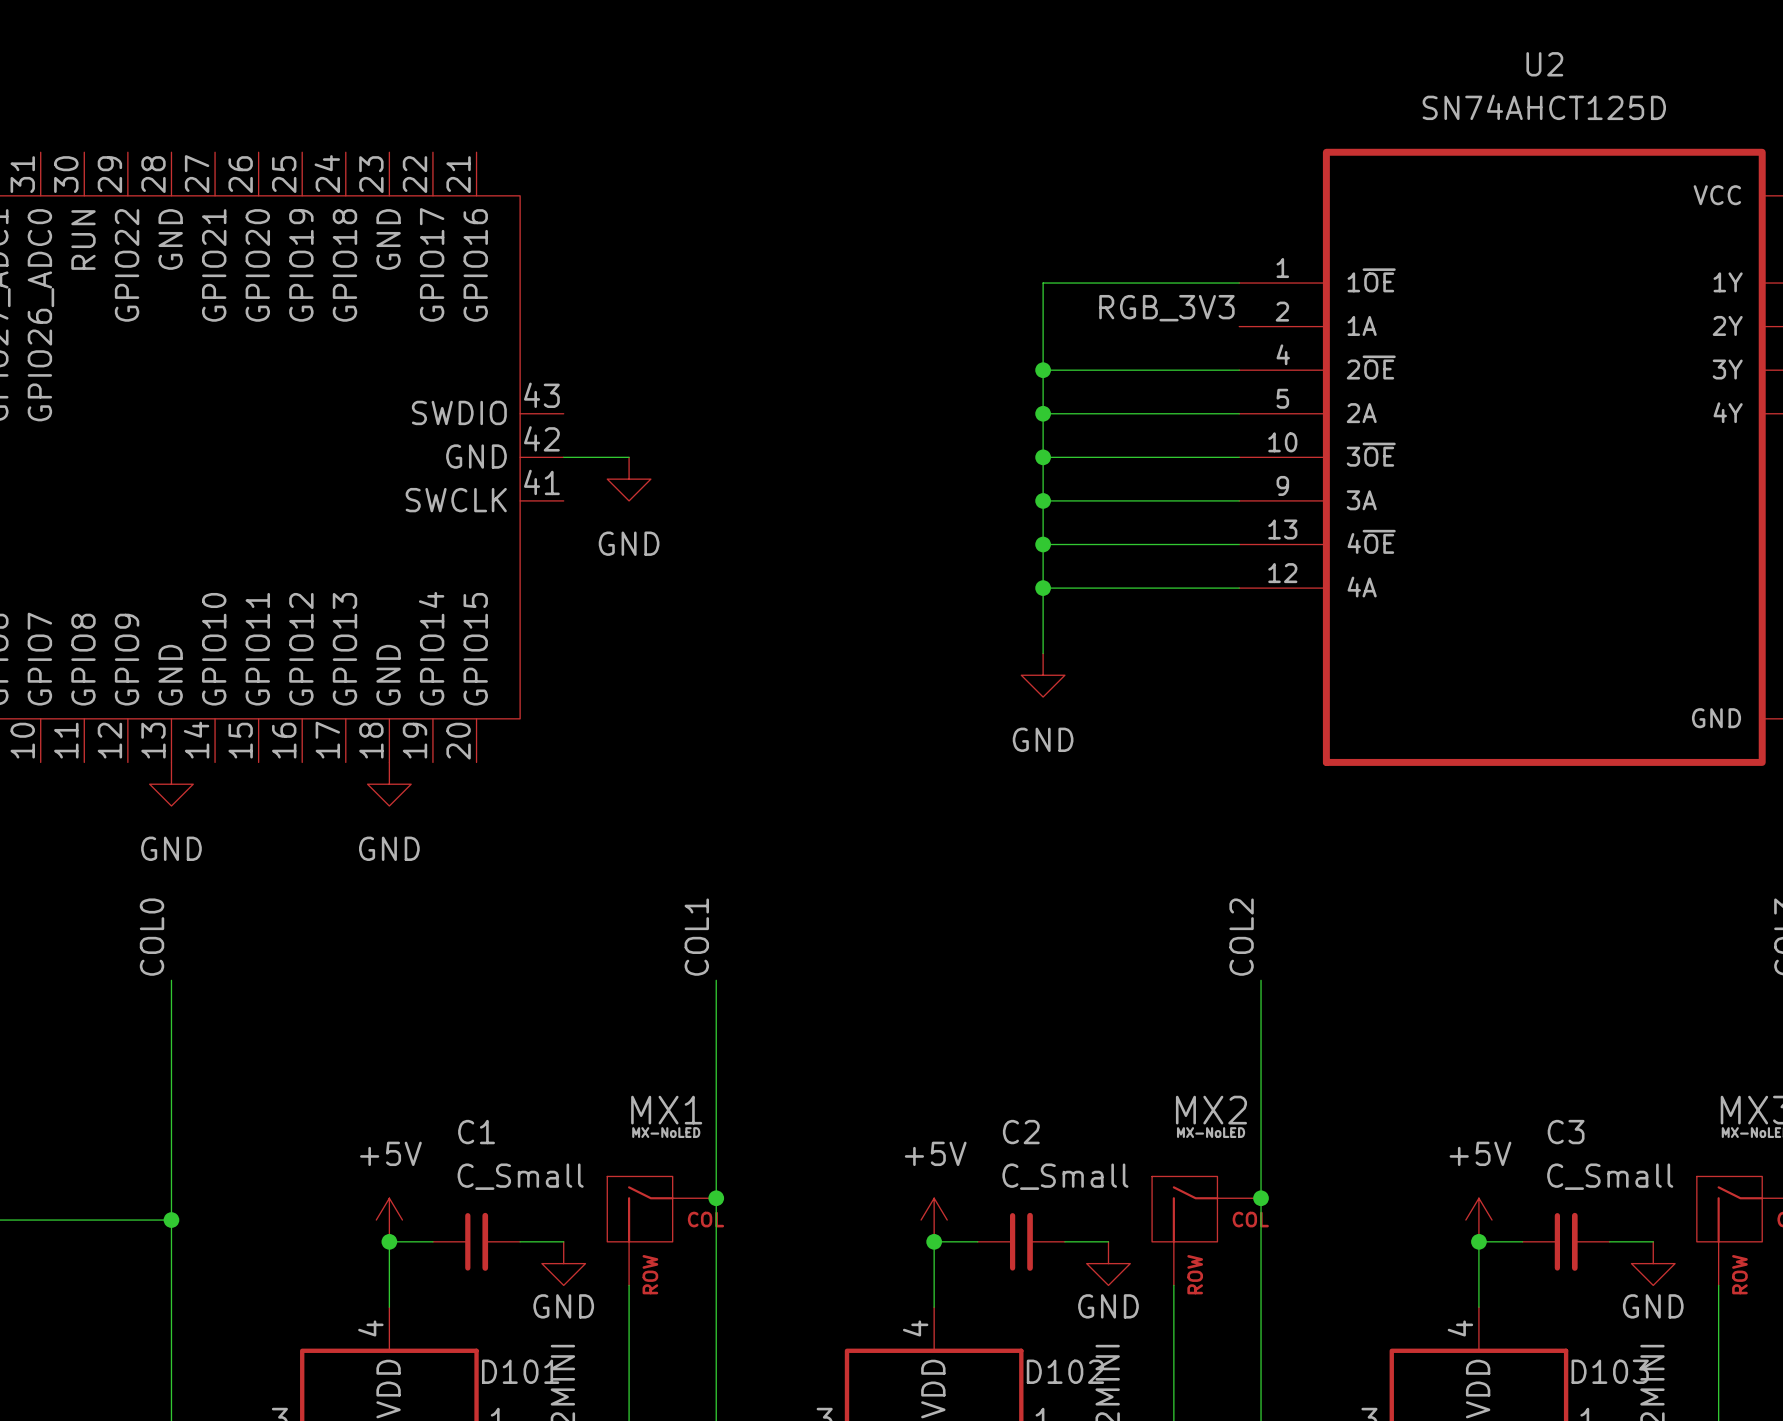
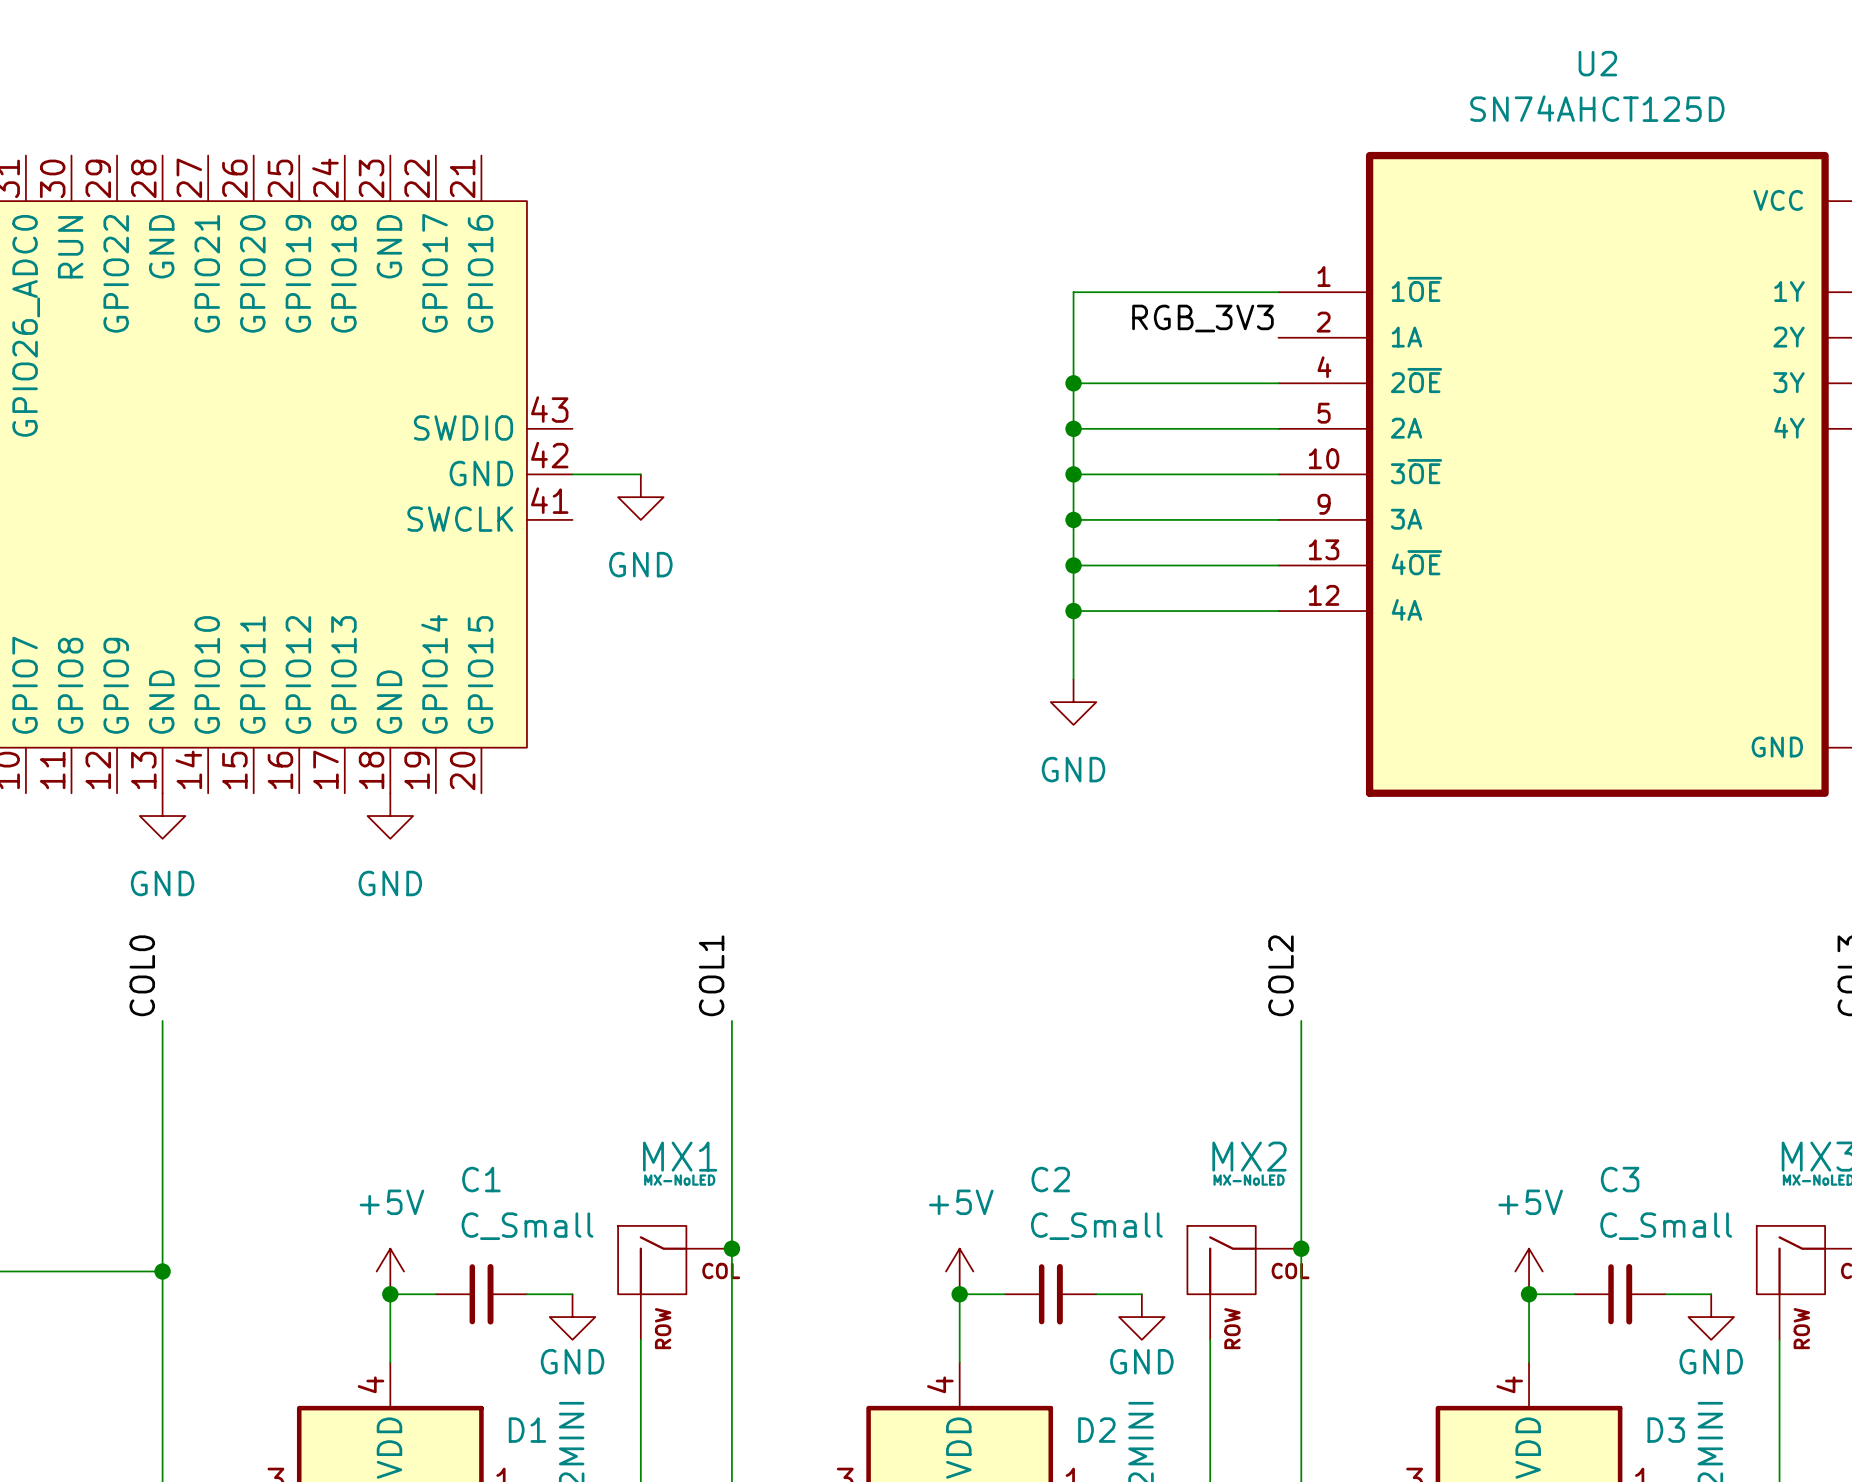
D101 name: D101 (520, 1371) -> D1 (527, 1430)
D102 name: D102 (1065, 1371) -> D2 (1096, 1430)
D103 name: D103 (1610, 1371) -> D3 (1666, 1430)

